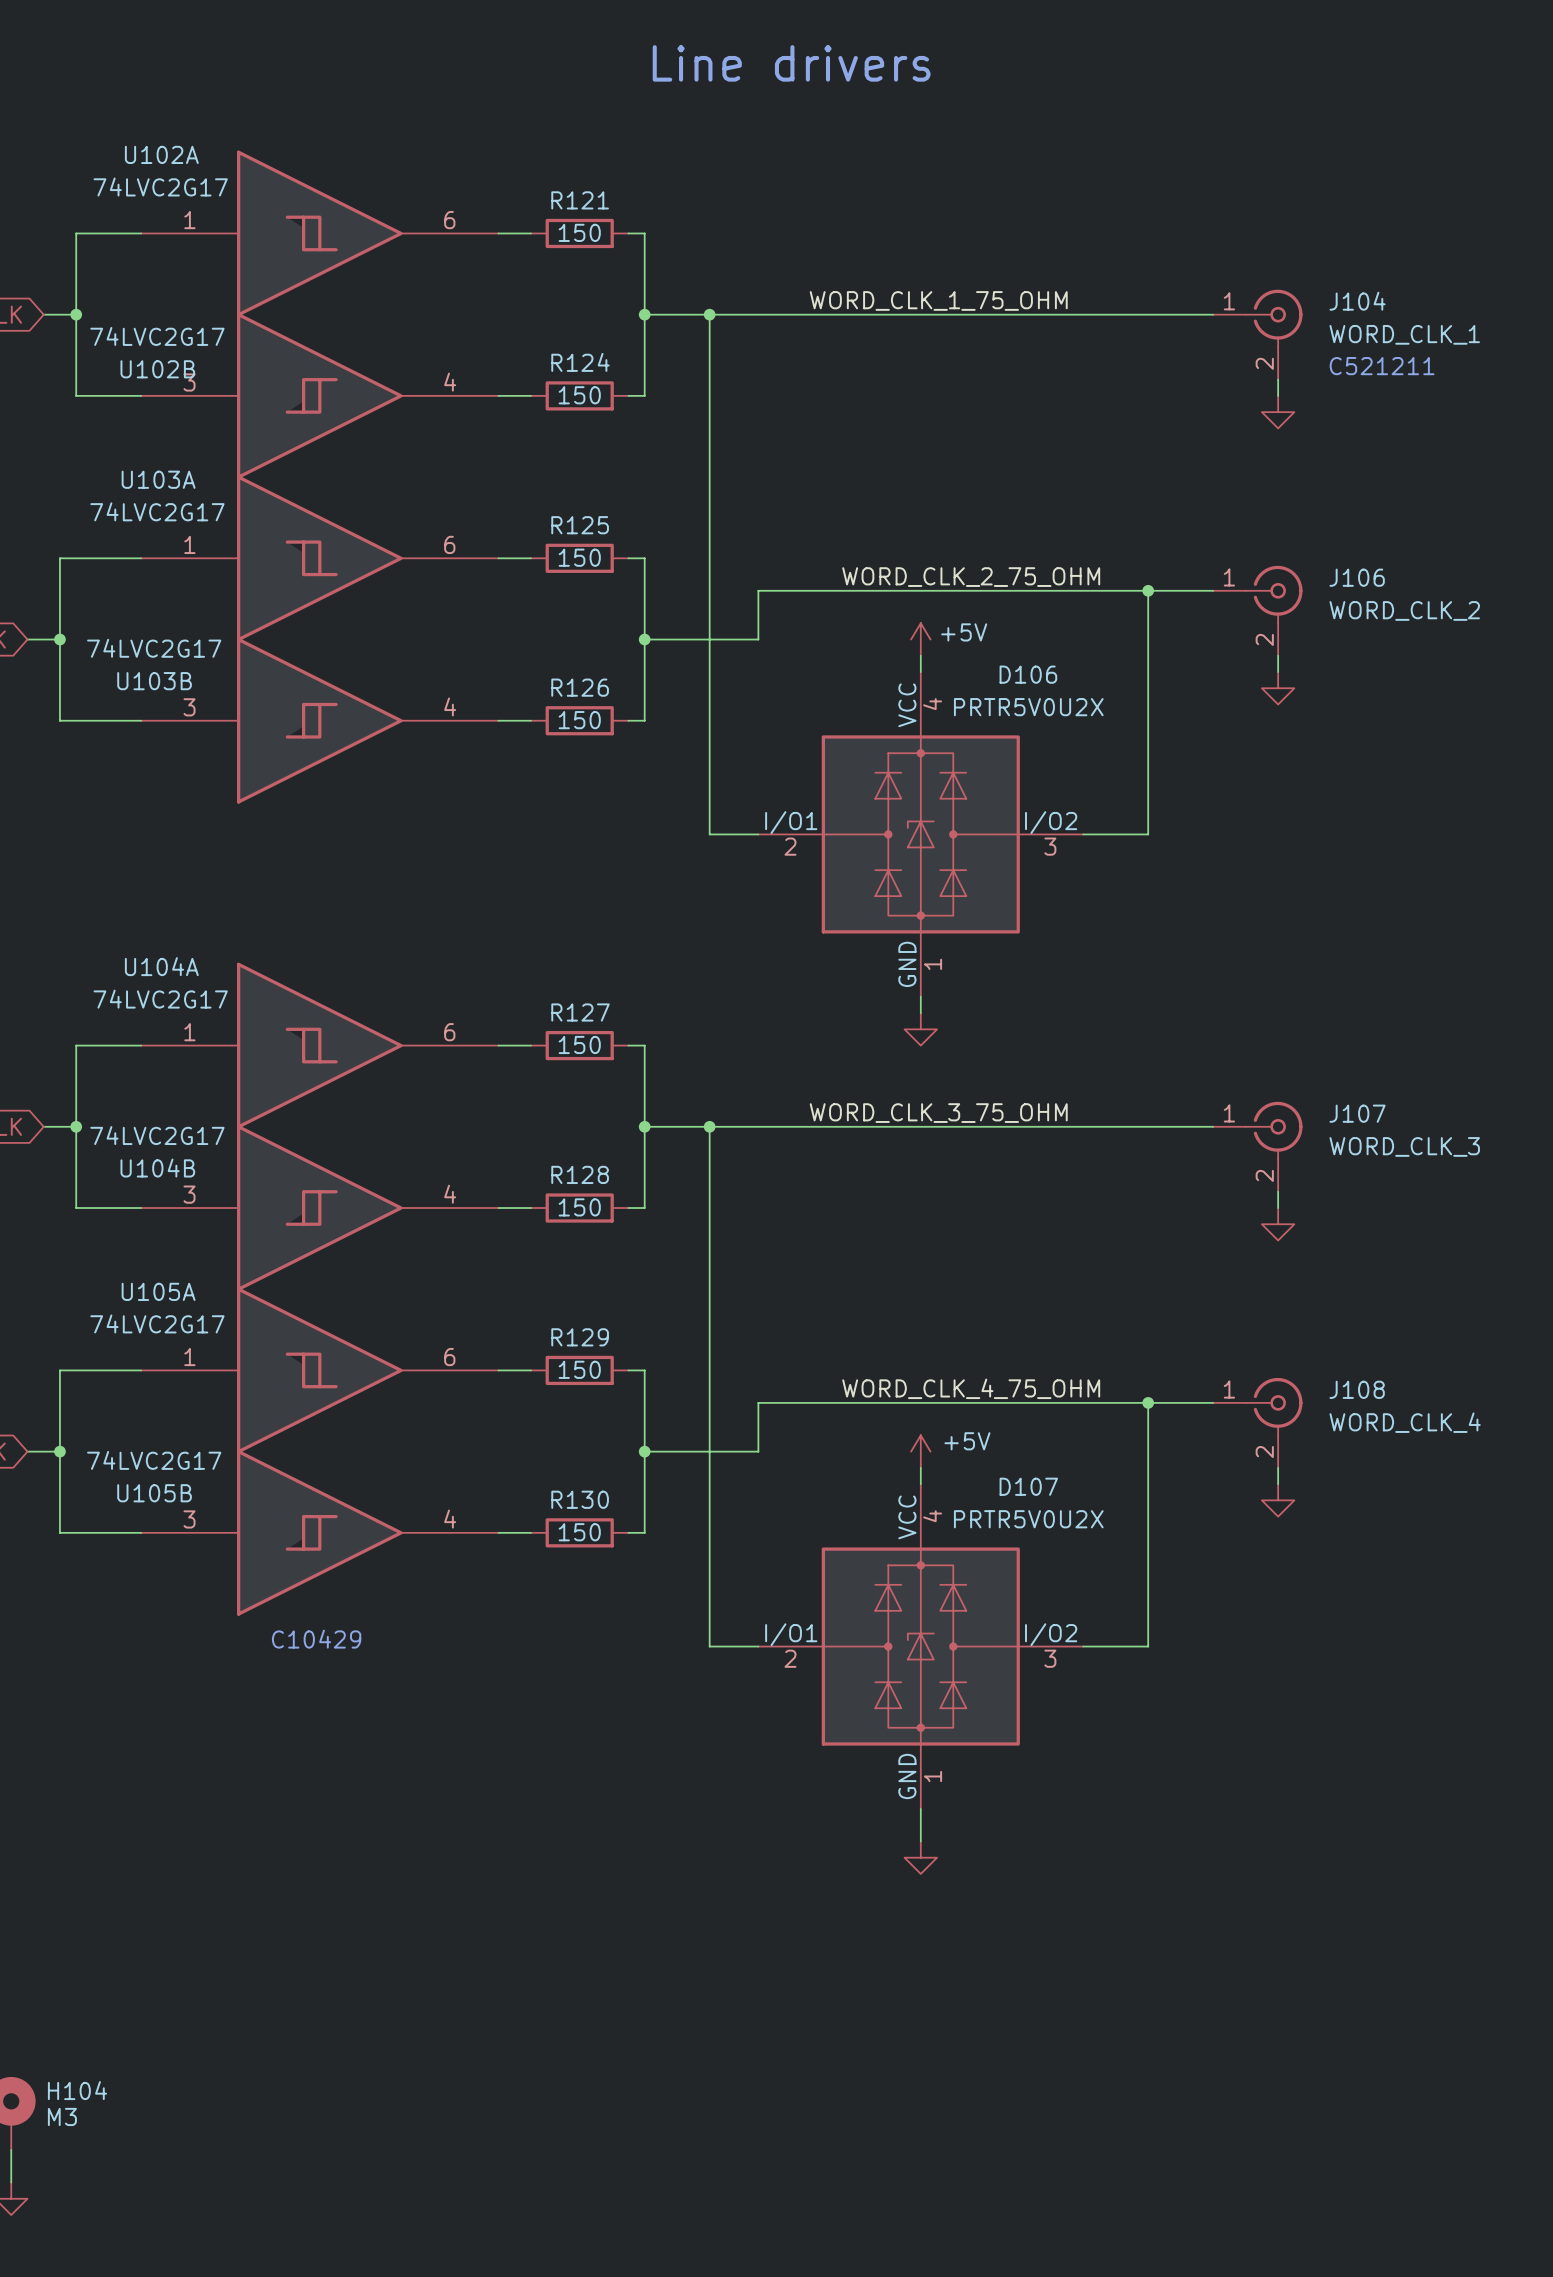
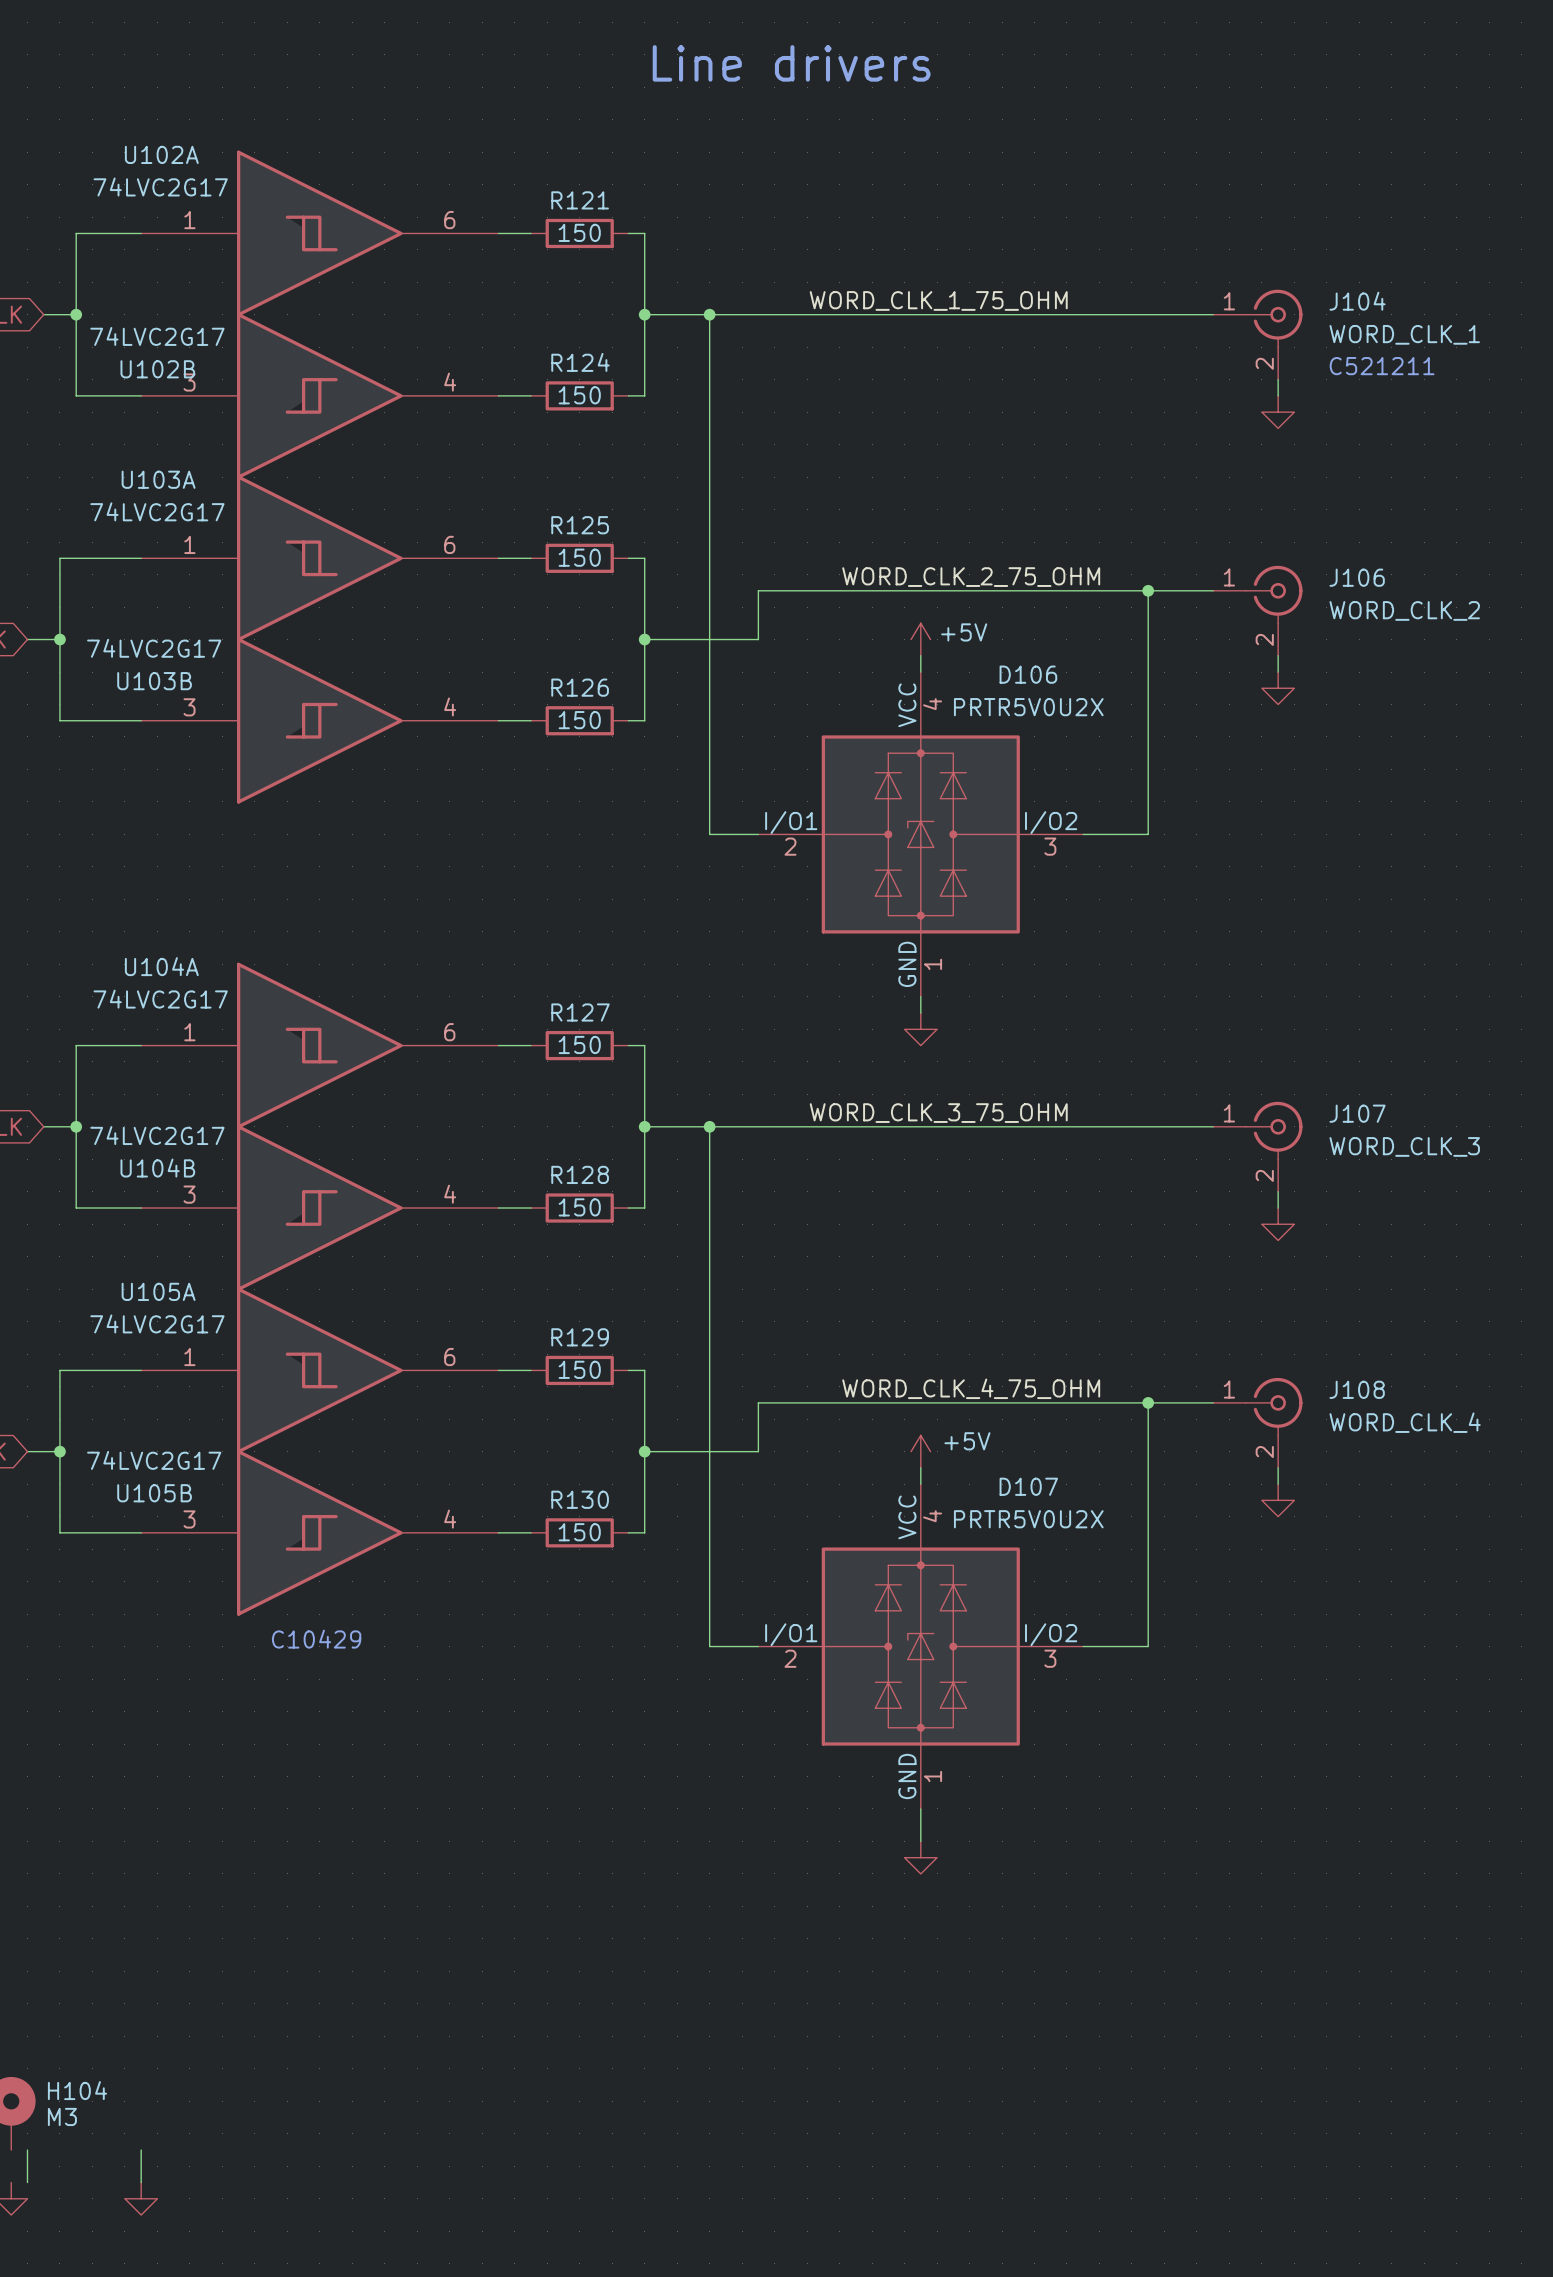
wire: (11, 2150) (11, 2182) -> (27, 2150) (27, 2182)
wire: none -> (141, 2150) (141, 2182)
power symbol: none -> (141, 2198)

